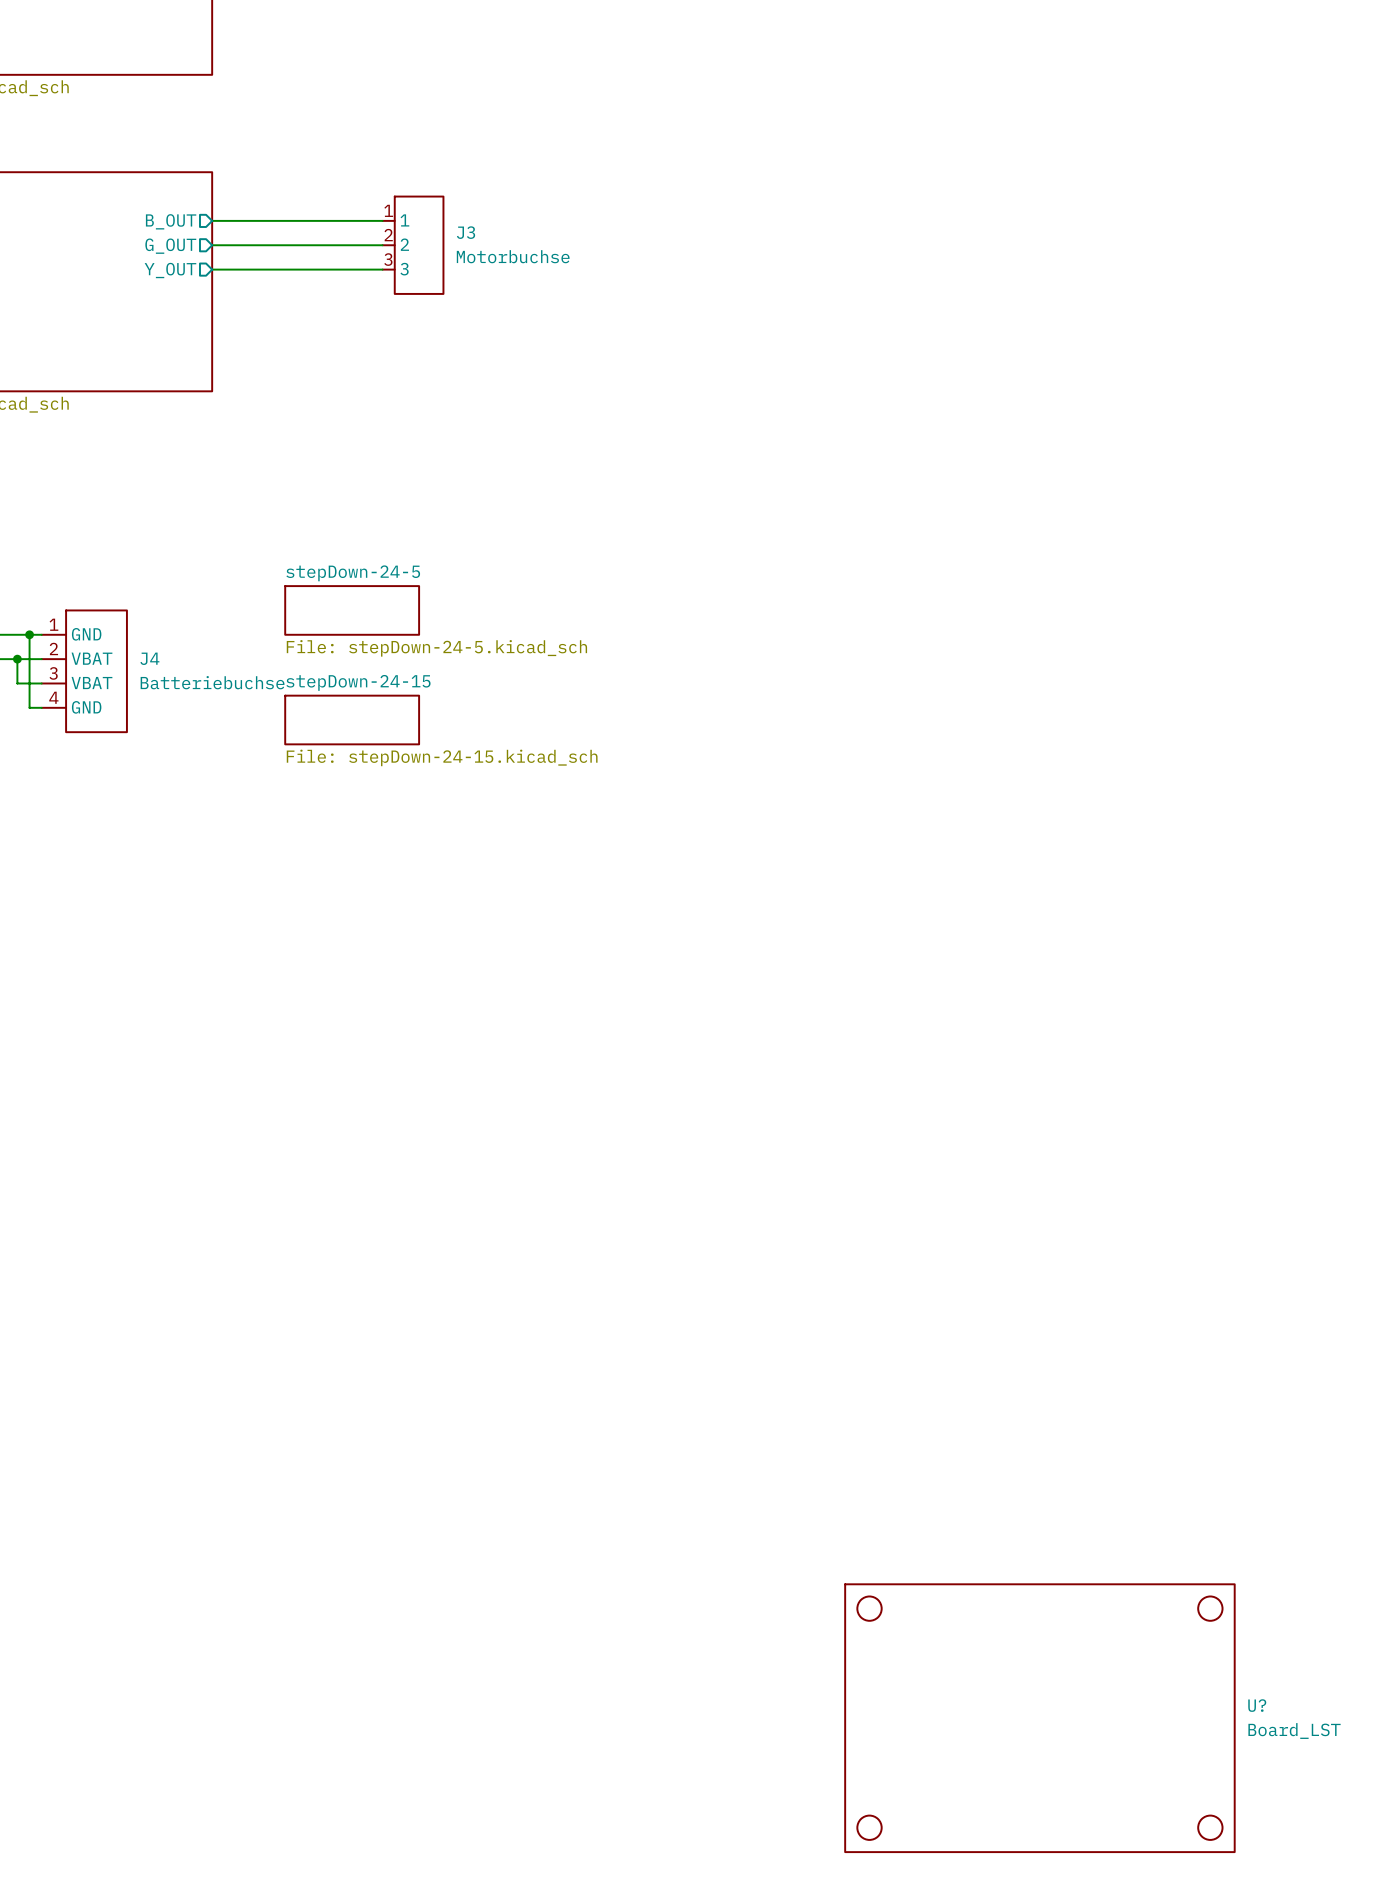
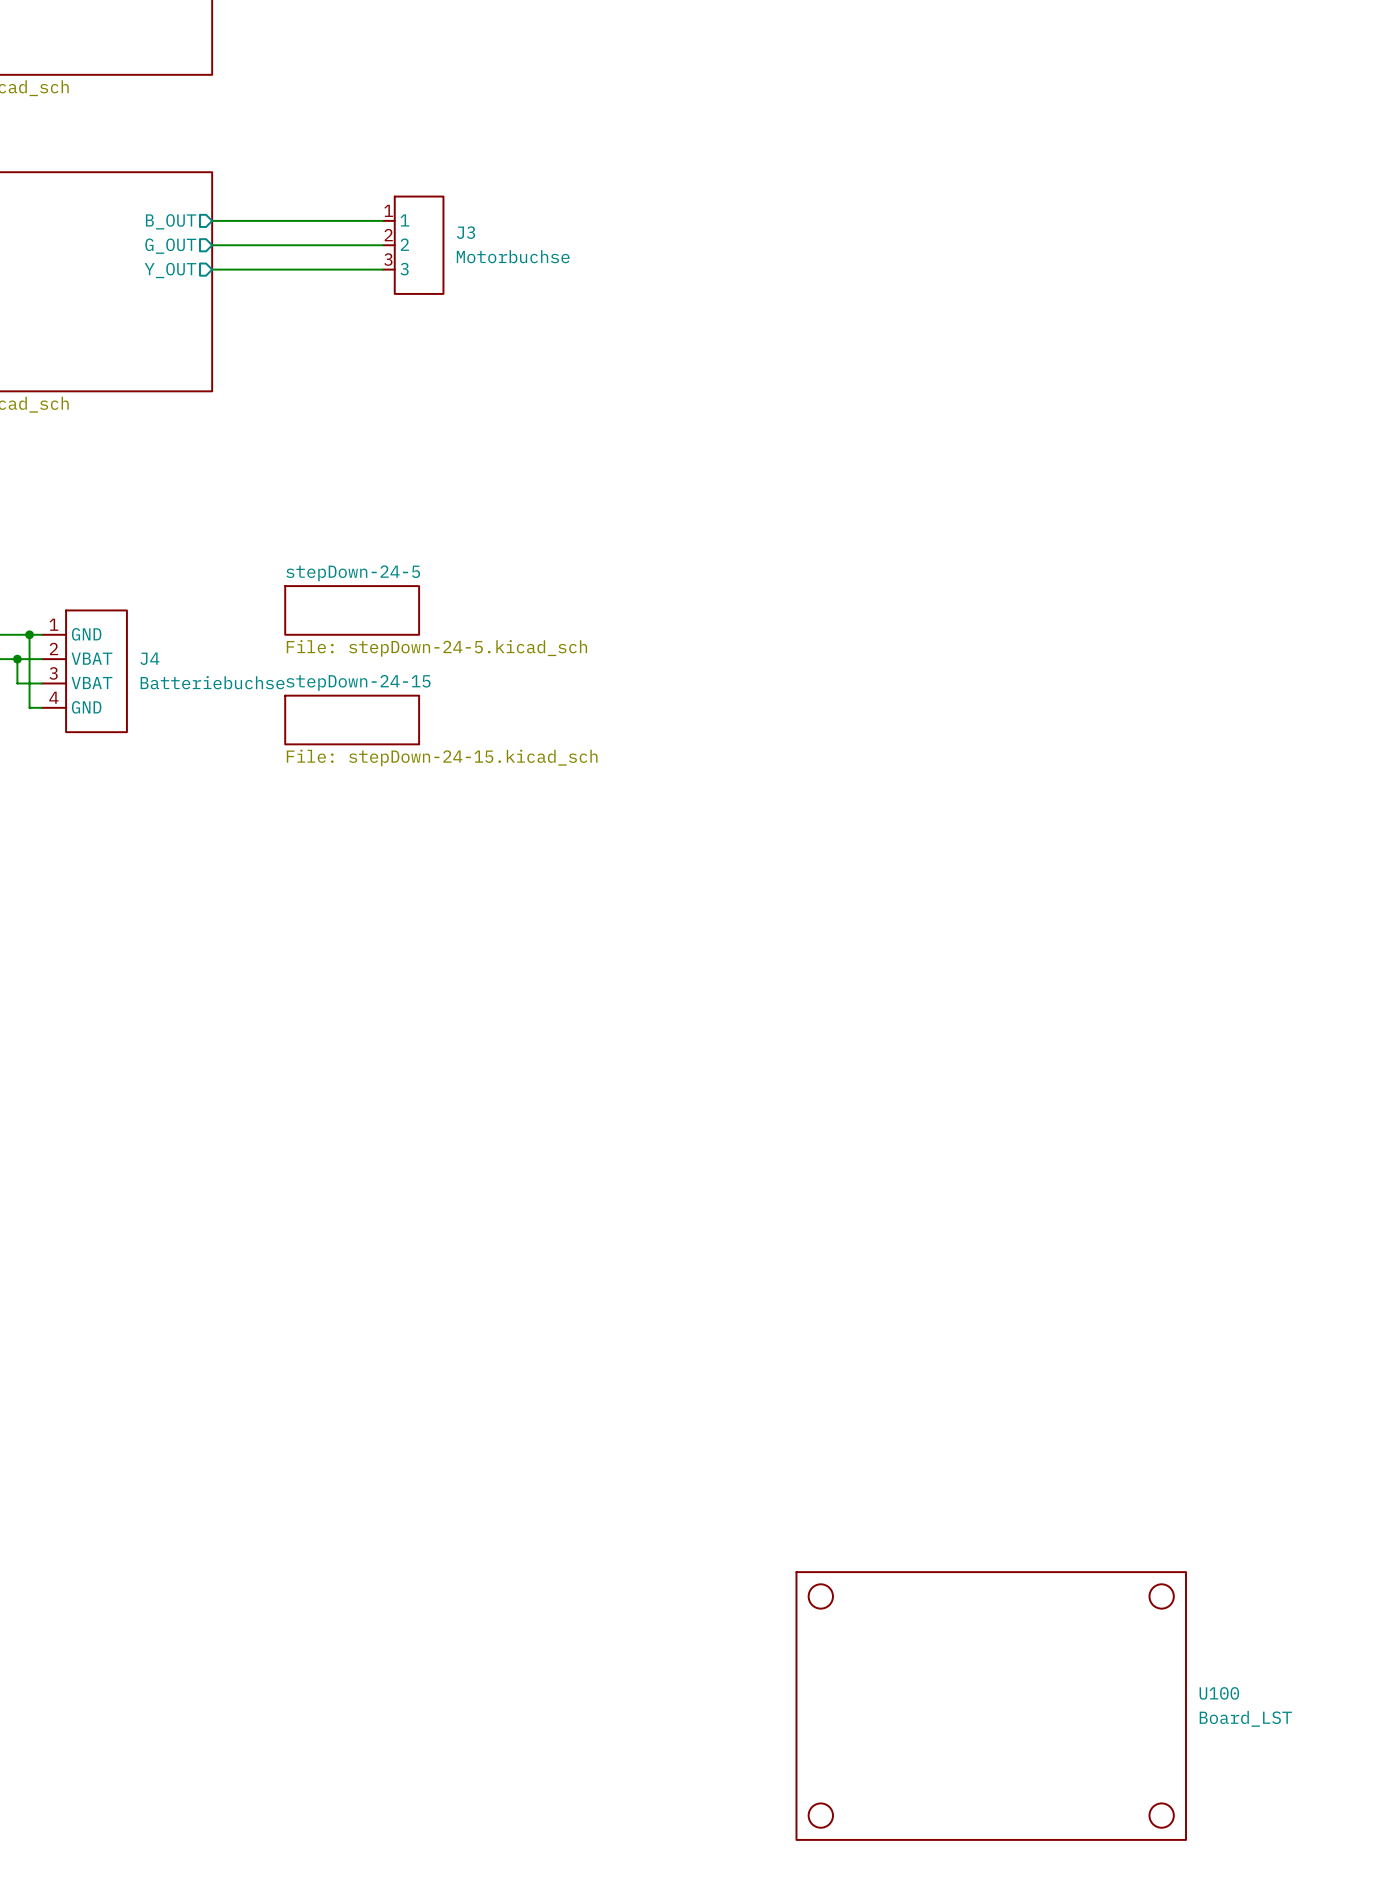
U100: none -> Board_LST (991, 1706)
U?: Board_LST (1039, 1718) -> none

